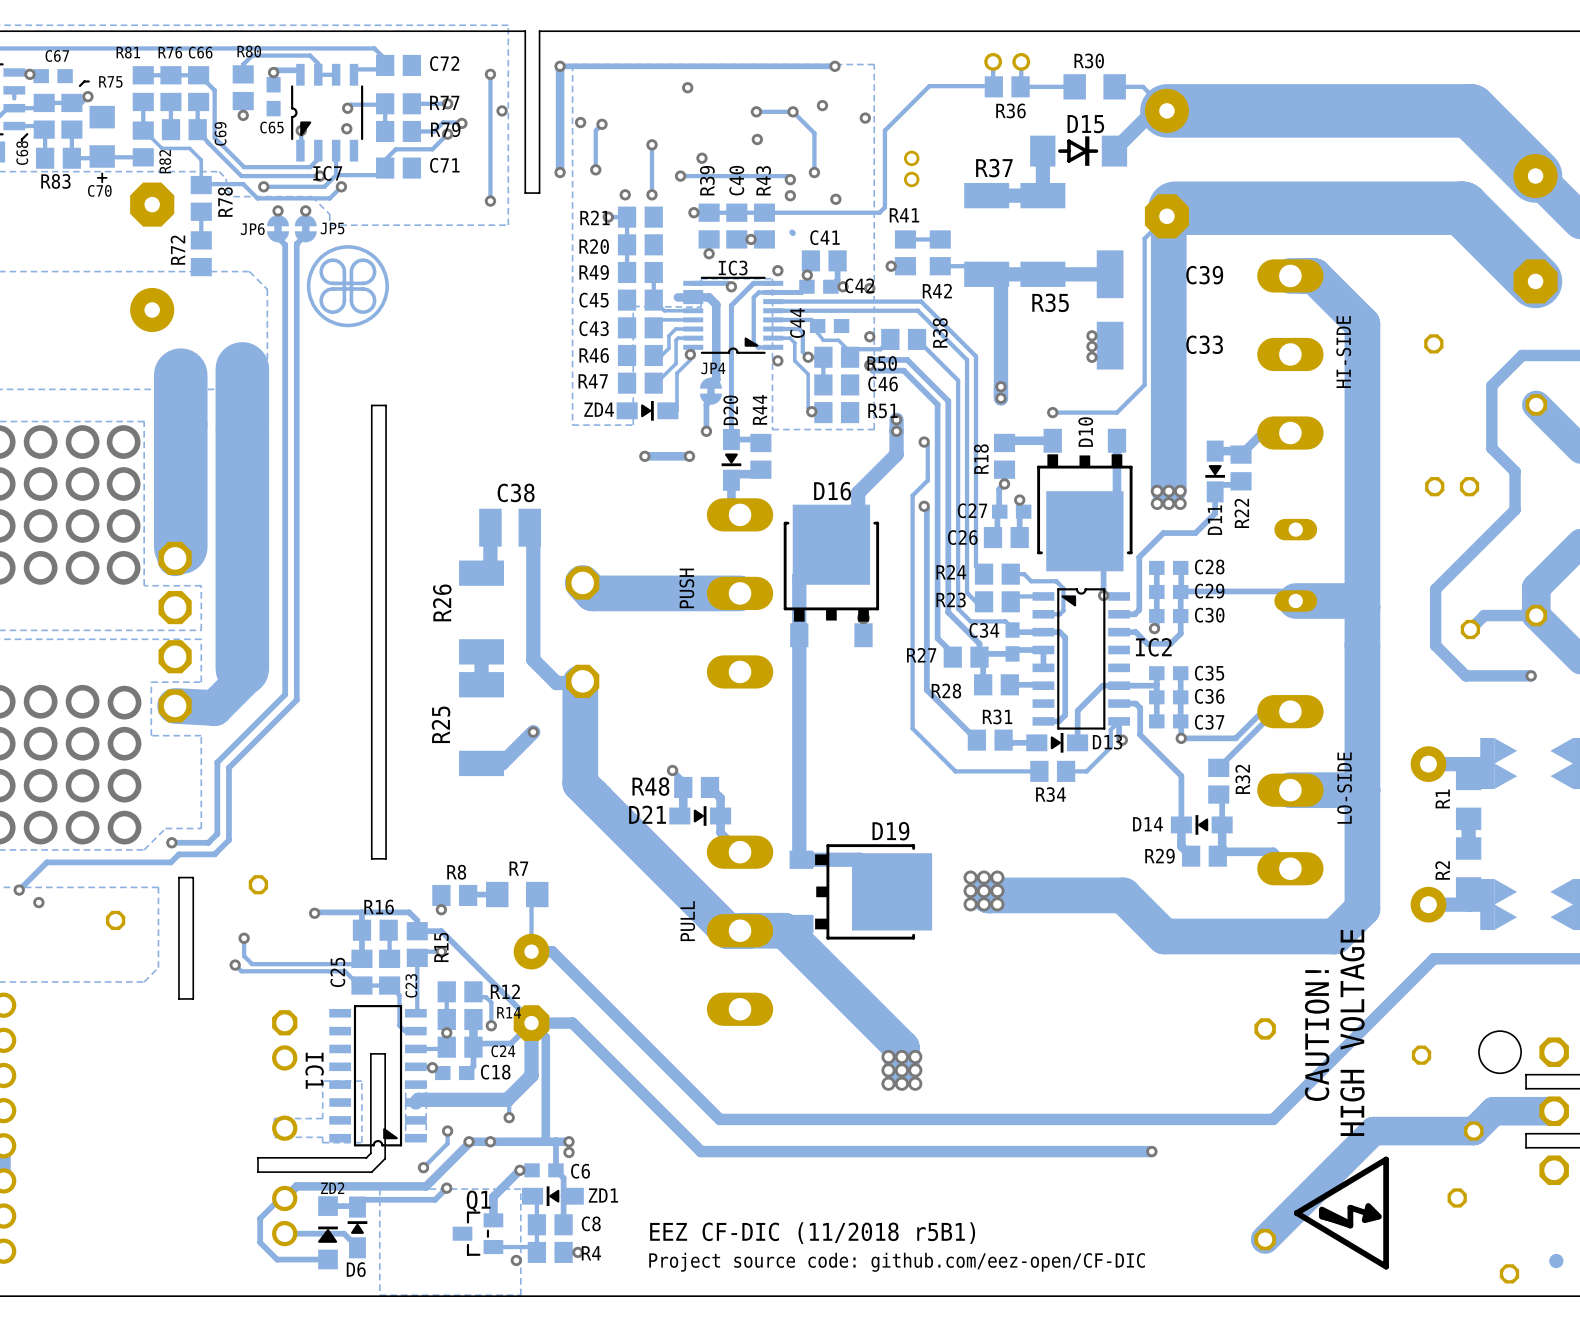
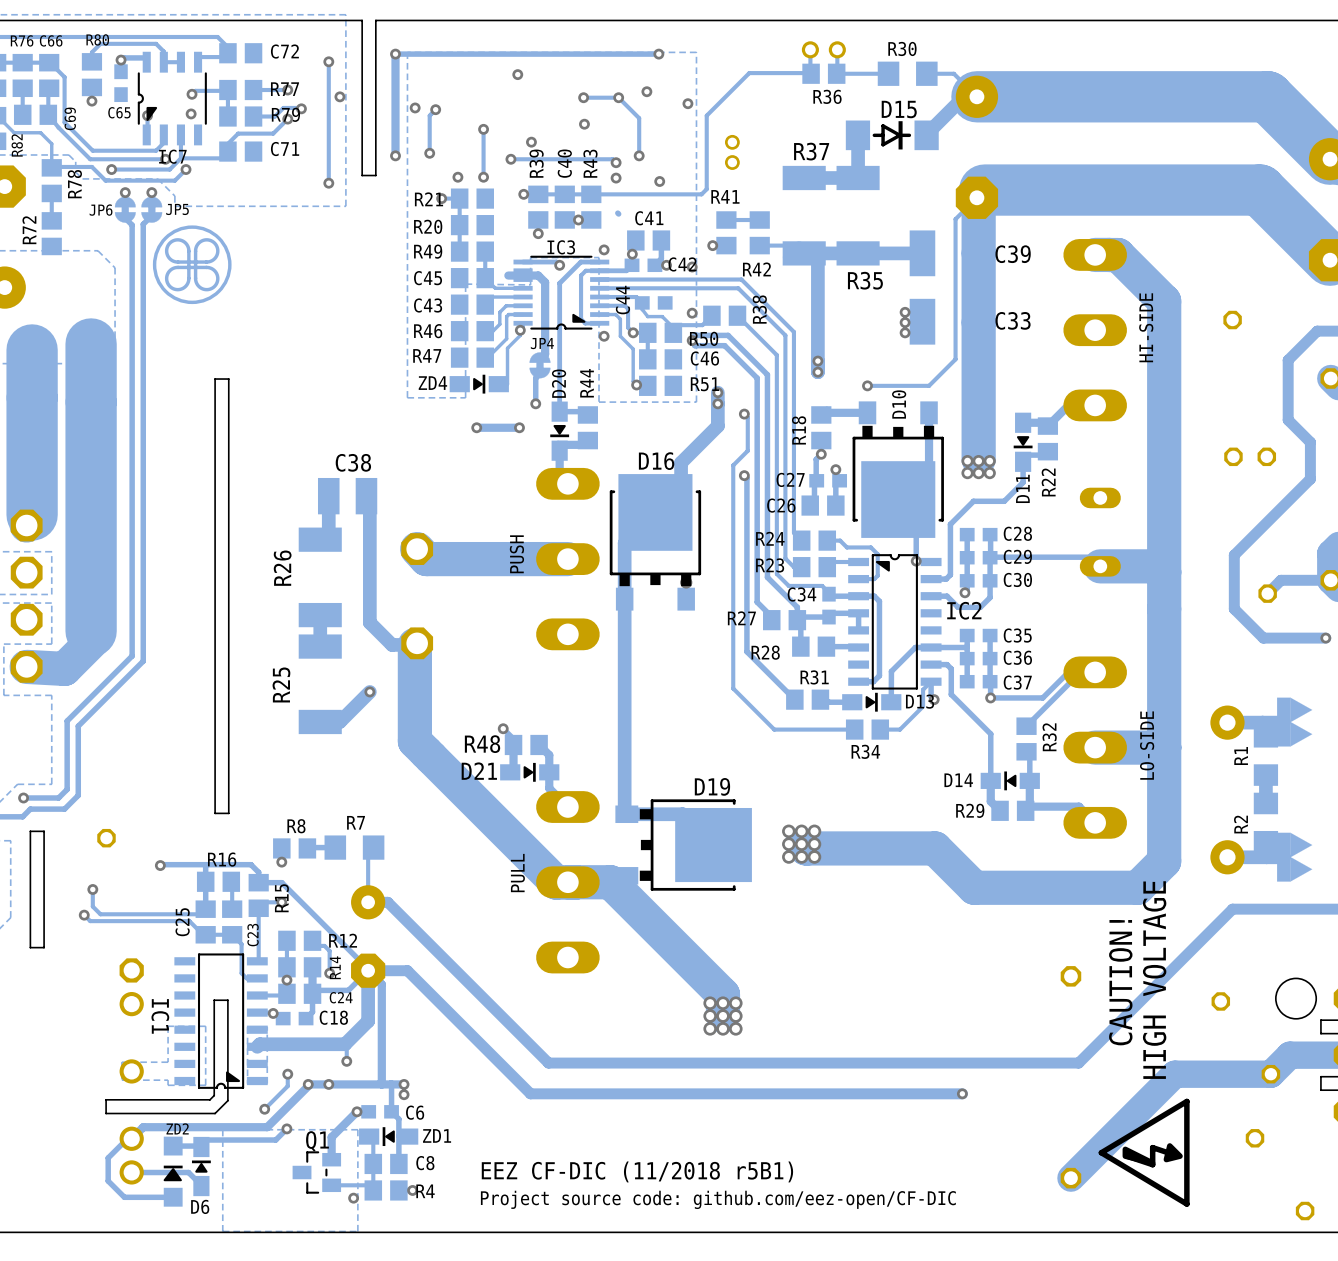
R14 name rotation: 0° (509, 1012) -> 90° counterclockwise (335, 967)

